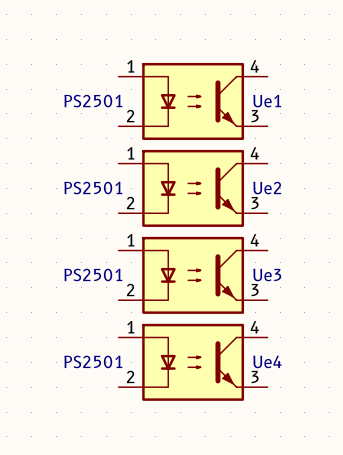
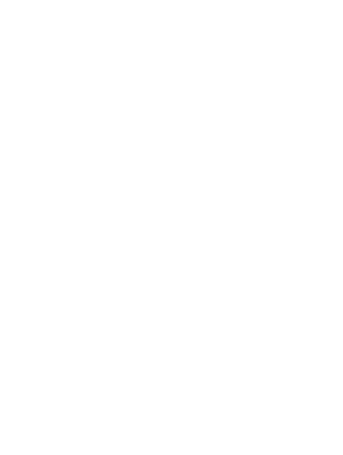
Ue1: PS2501 (193, 101) -> none
Ue2: PS2501 (193, 188) -> none
Ue3: PS2501 (193, 275) -> none
Ue4: PS2501 (193, 362) -> none

